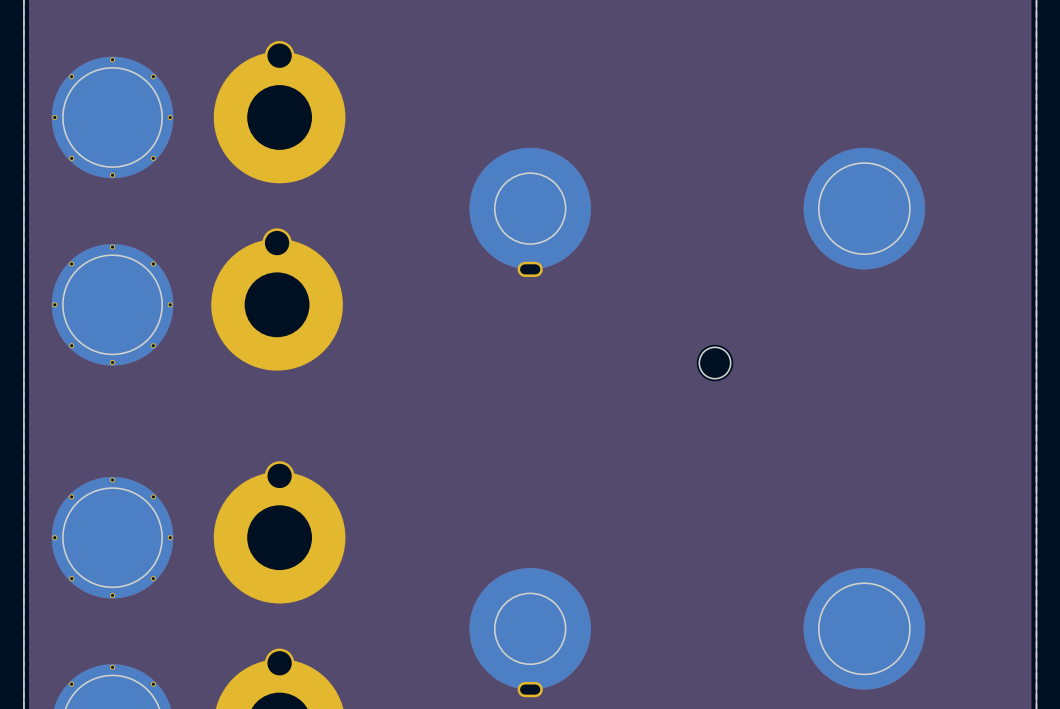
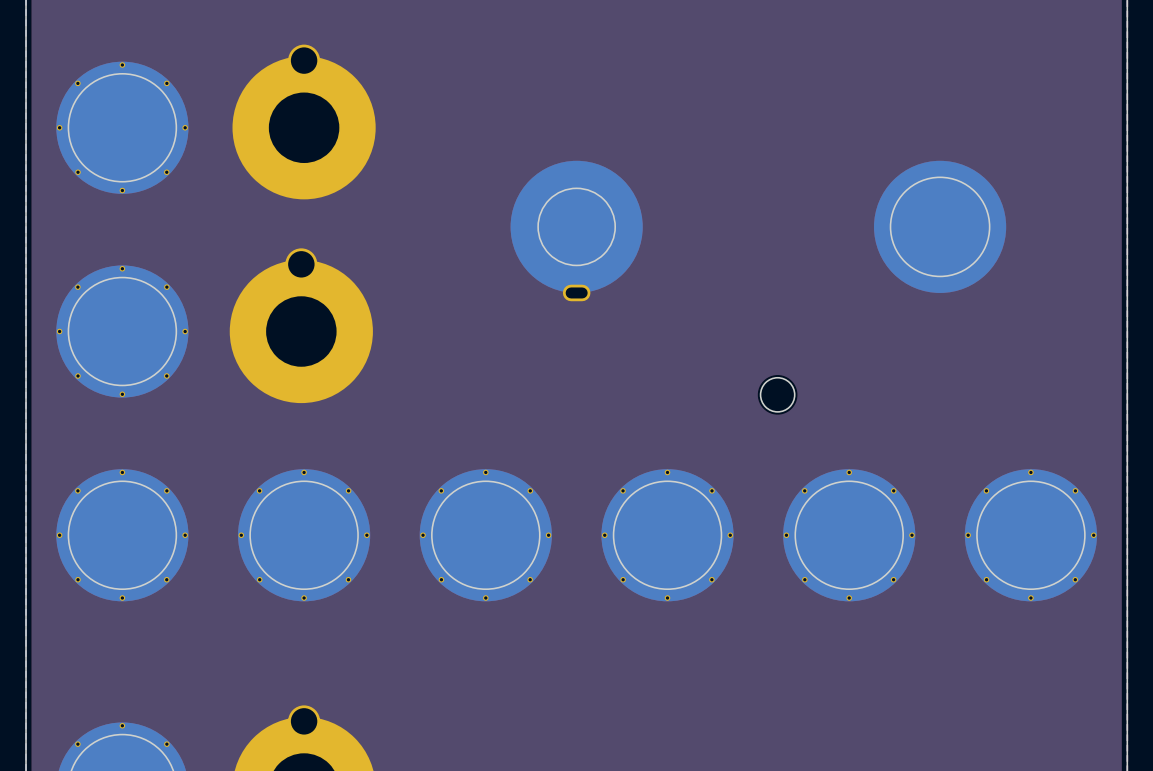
part: none -> (304, 535)
part: none -> (485, 535)
part: none -> (667, 535)
part: none -> (849, 535)
part: none -> (1030, 535)
part: (279, 532) -> none
part position: (112, 537) -> (122, 535)
part: (864, 628) -> none
part: (530, 632) -> none

